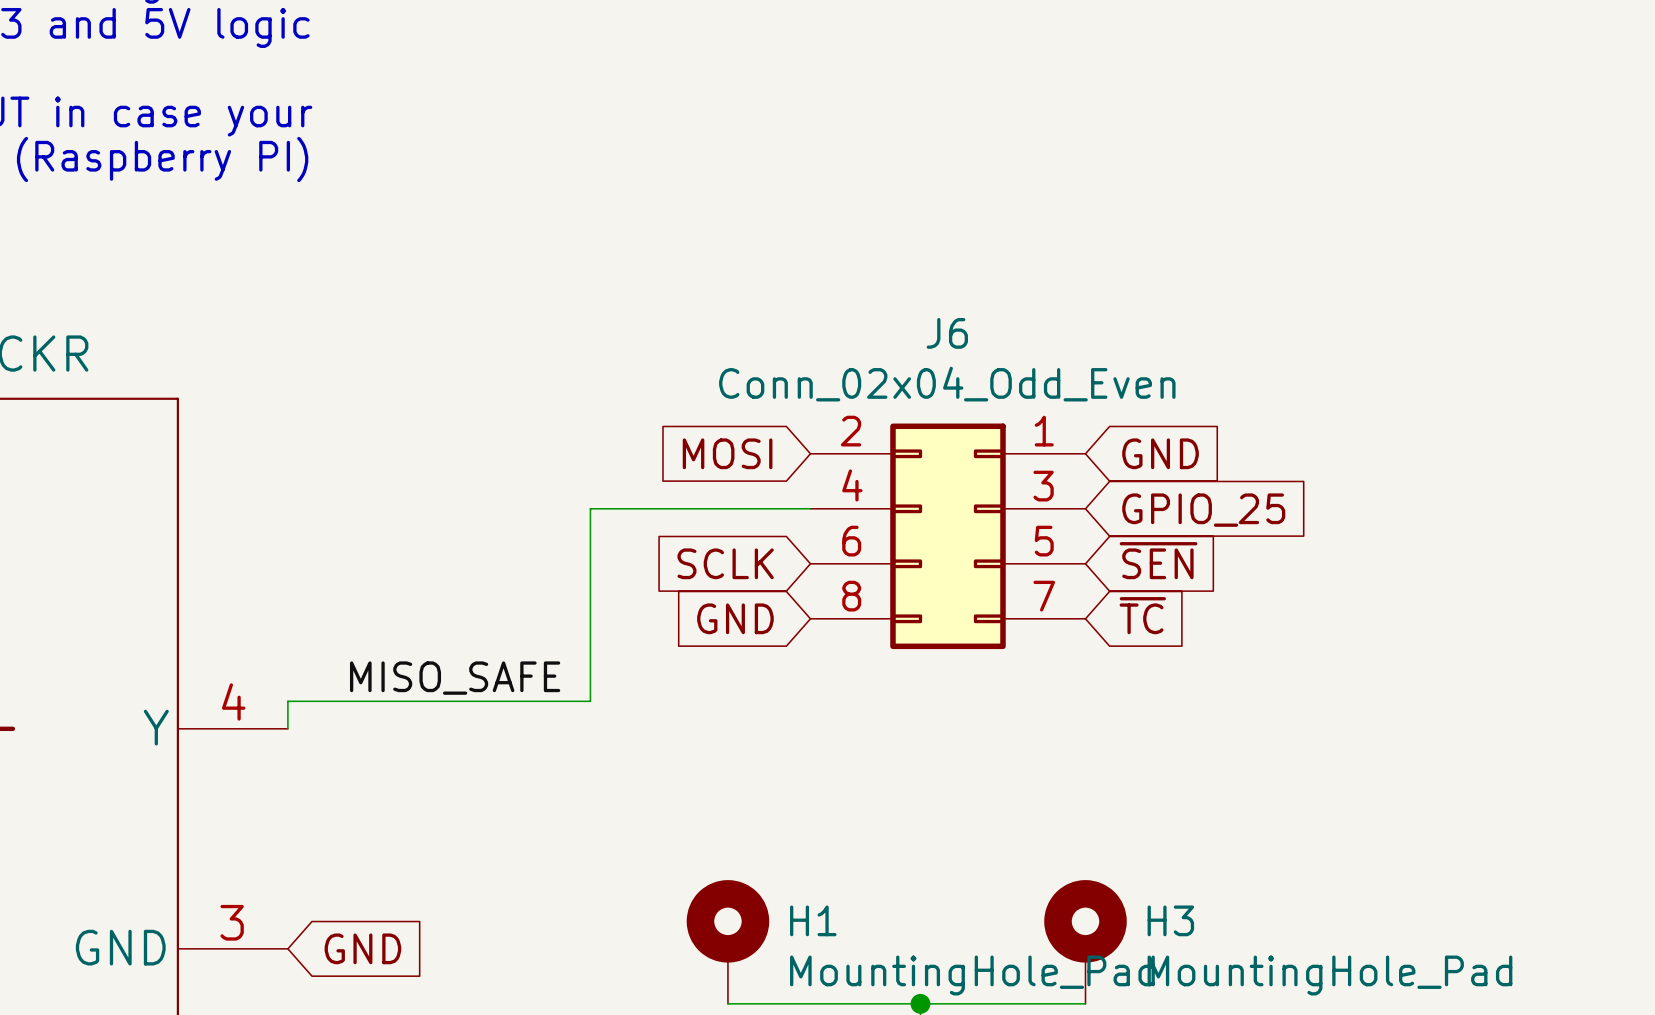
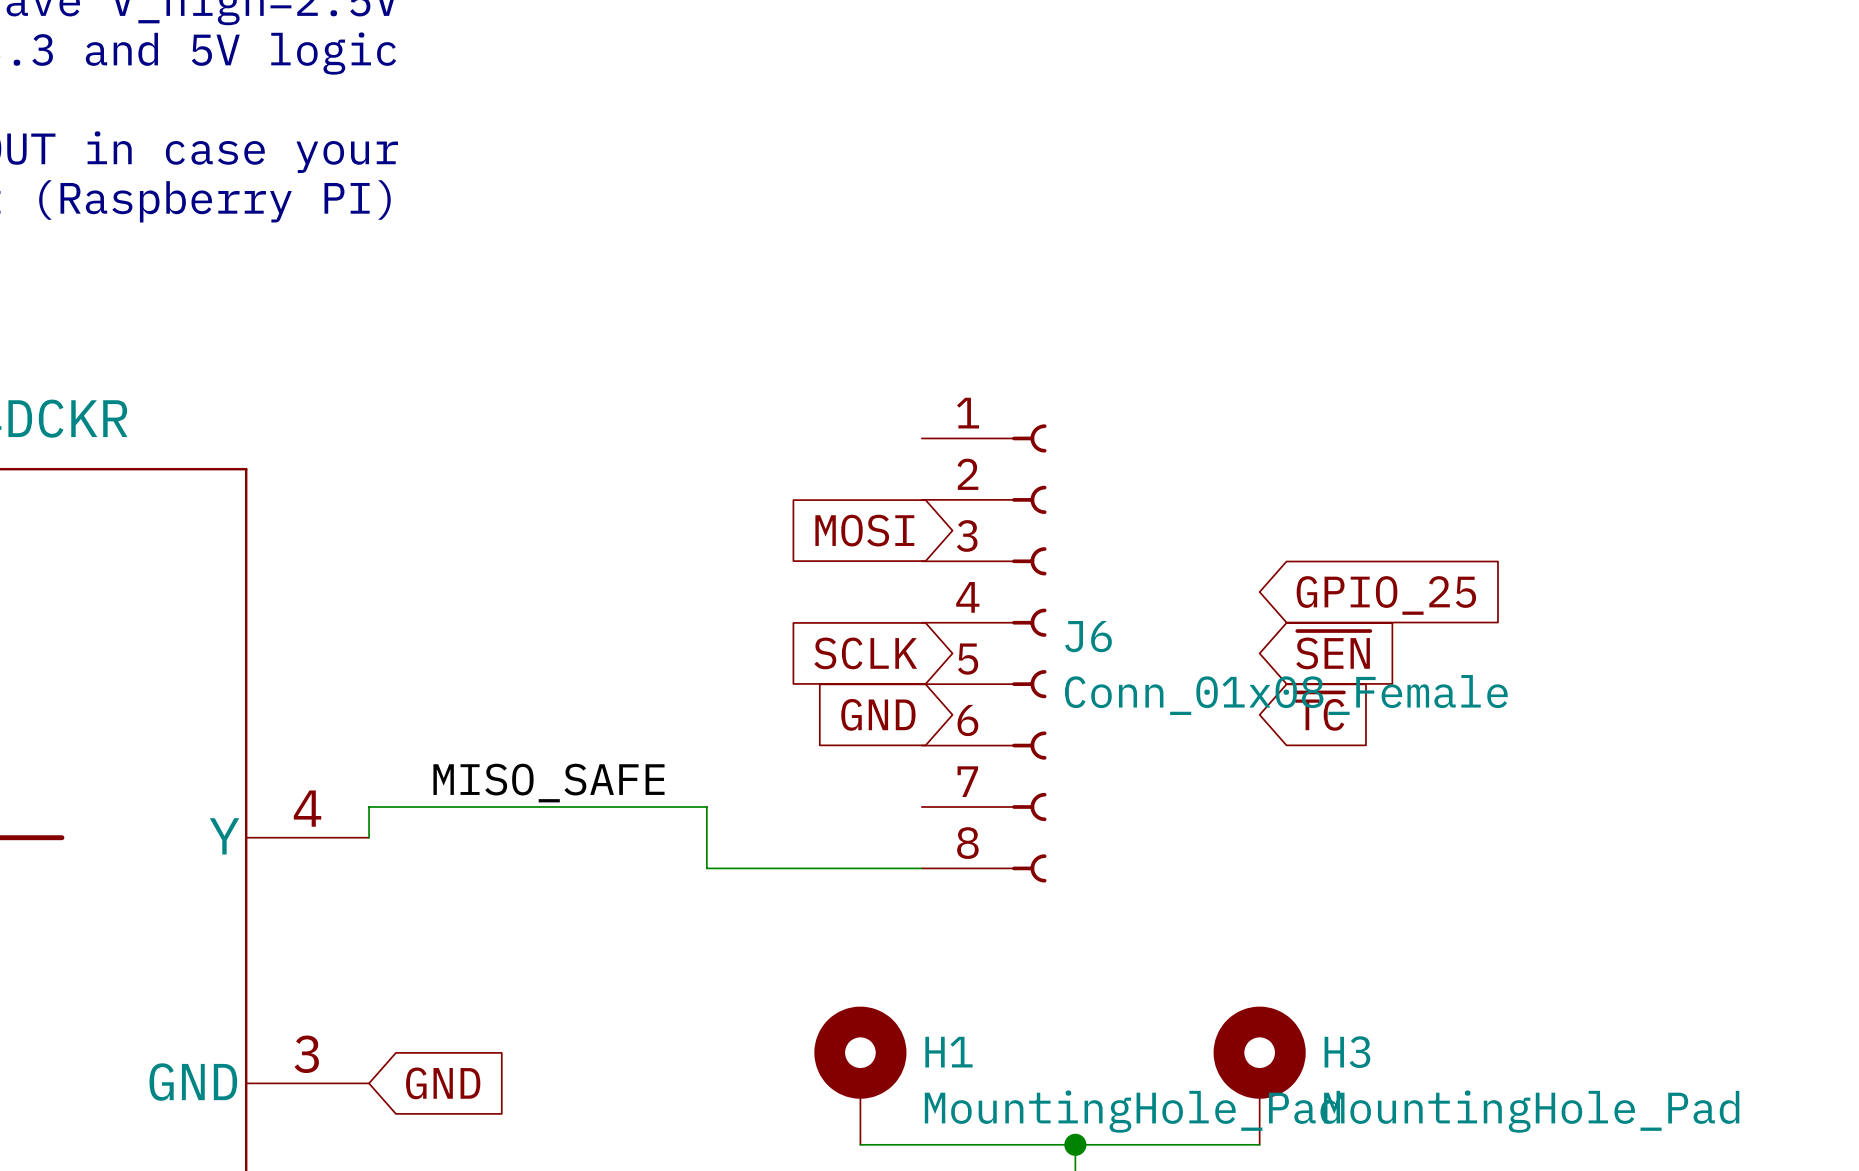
J6 name position: J6 (947, 333) -> J6 (1088, 636)
J6 value: Conn_02x04_Odd_Even (947, 384) -> Conn_01x08_Female (1286, 695)
J6 symbol: [810, 423, 1086, 650] -> [921, 424, 1047, 883]
global label: GND (1160, 453) -> none
wire: (810, 508) (590, 508) (590, 701) -> (921, 868) (706, 868) (706, 806)

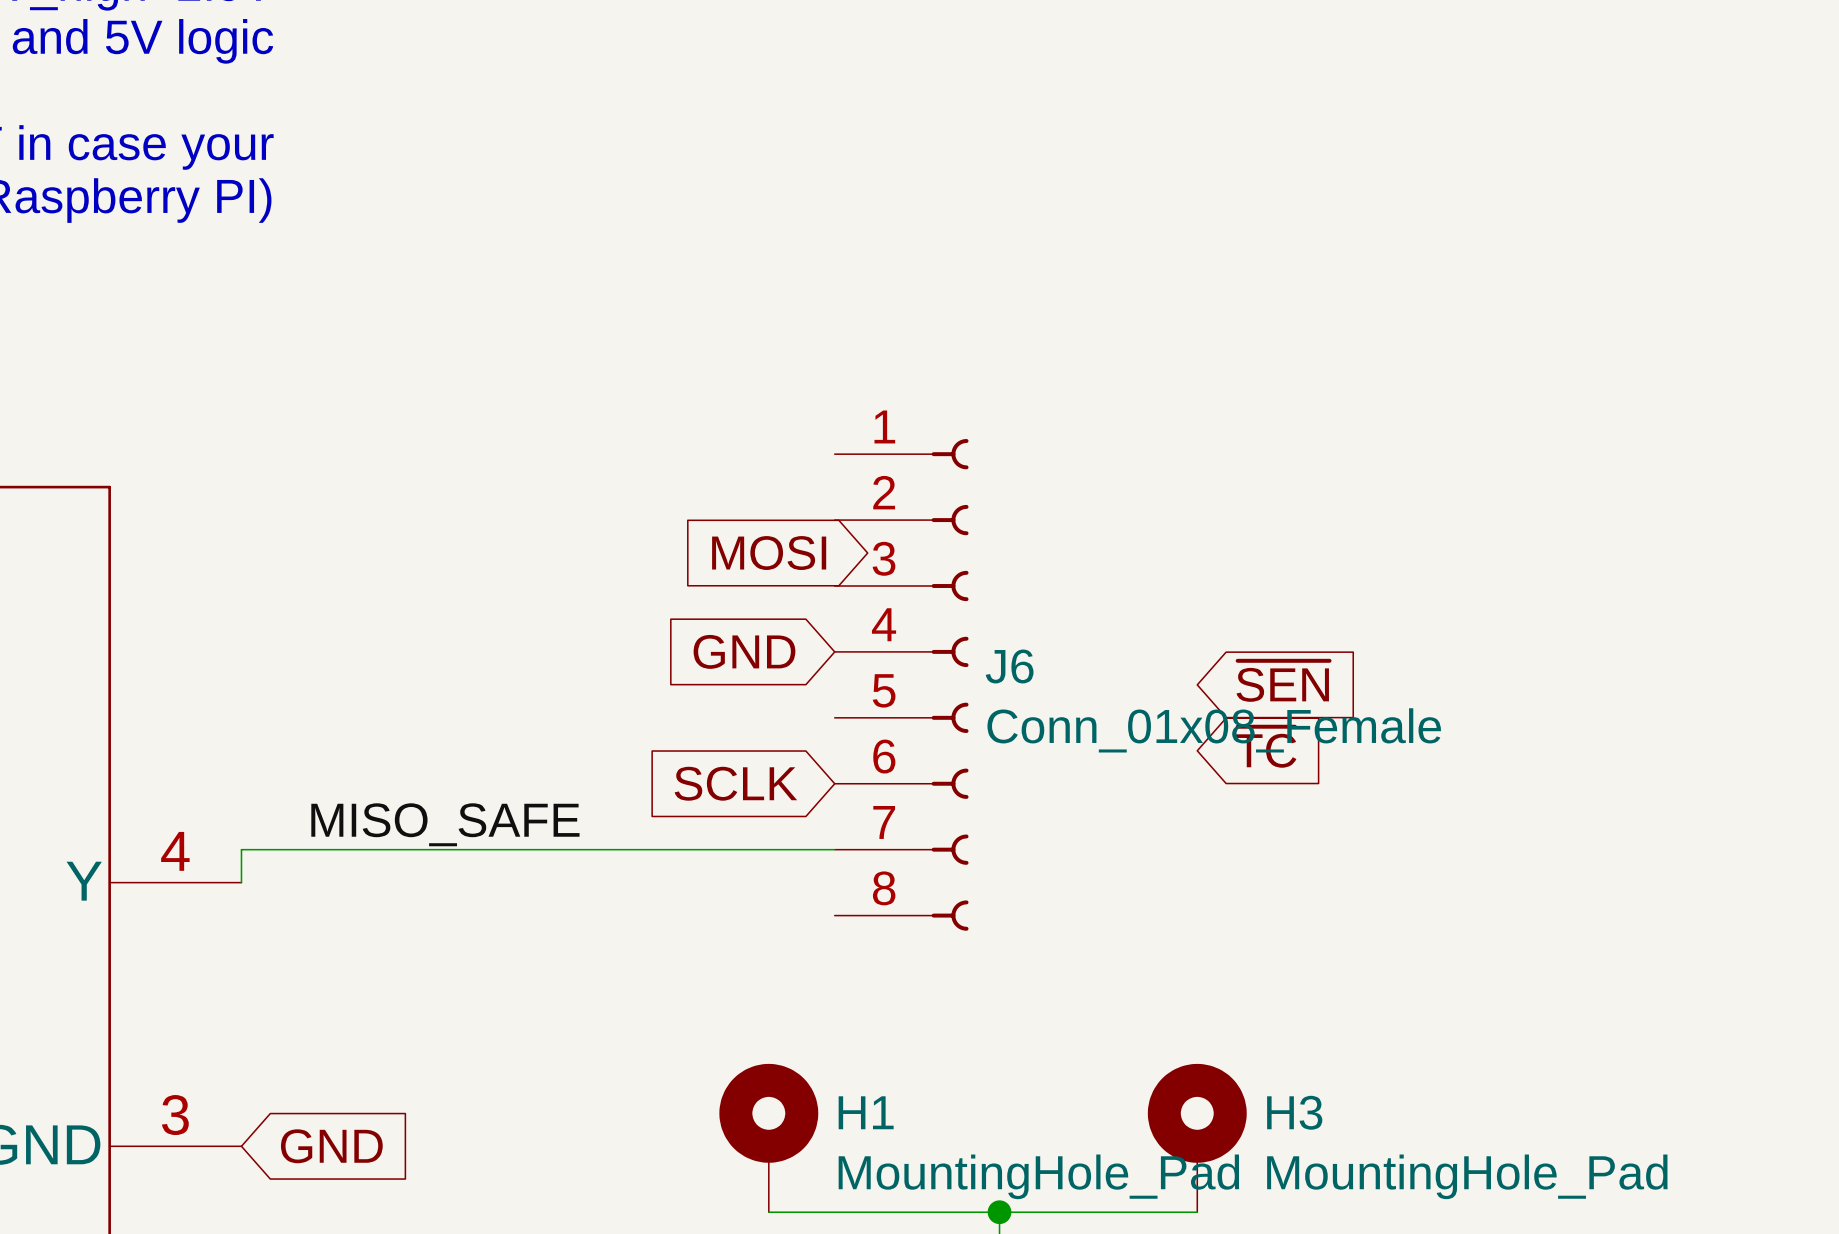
global label: GPIO_25 (1386, 595) -> none
global label position: SCLK (865, 653) -> SCLK (735, 783)
global label position: GND (878, 714) -> GND (744, 651)
wire: (706, 806) (706, 868) (921, 868) -> (604, 849) (834, 849)

